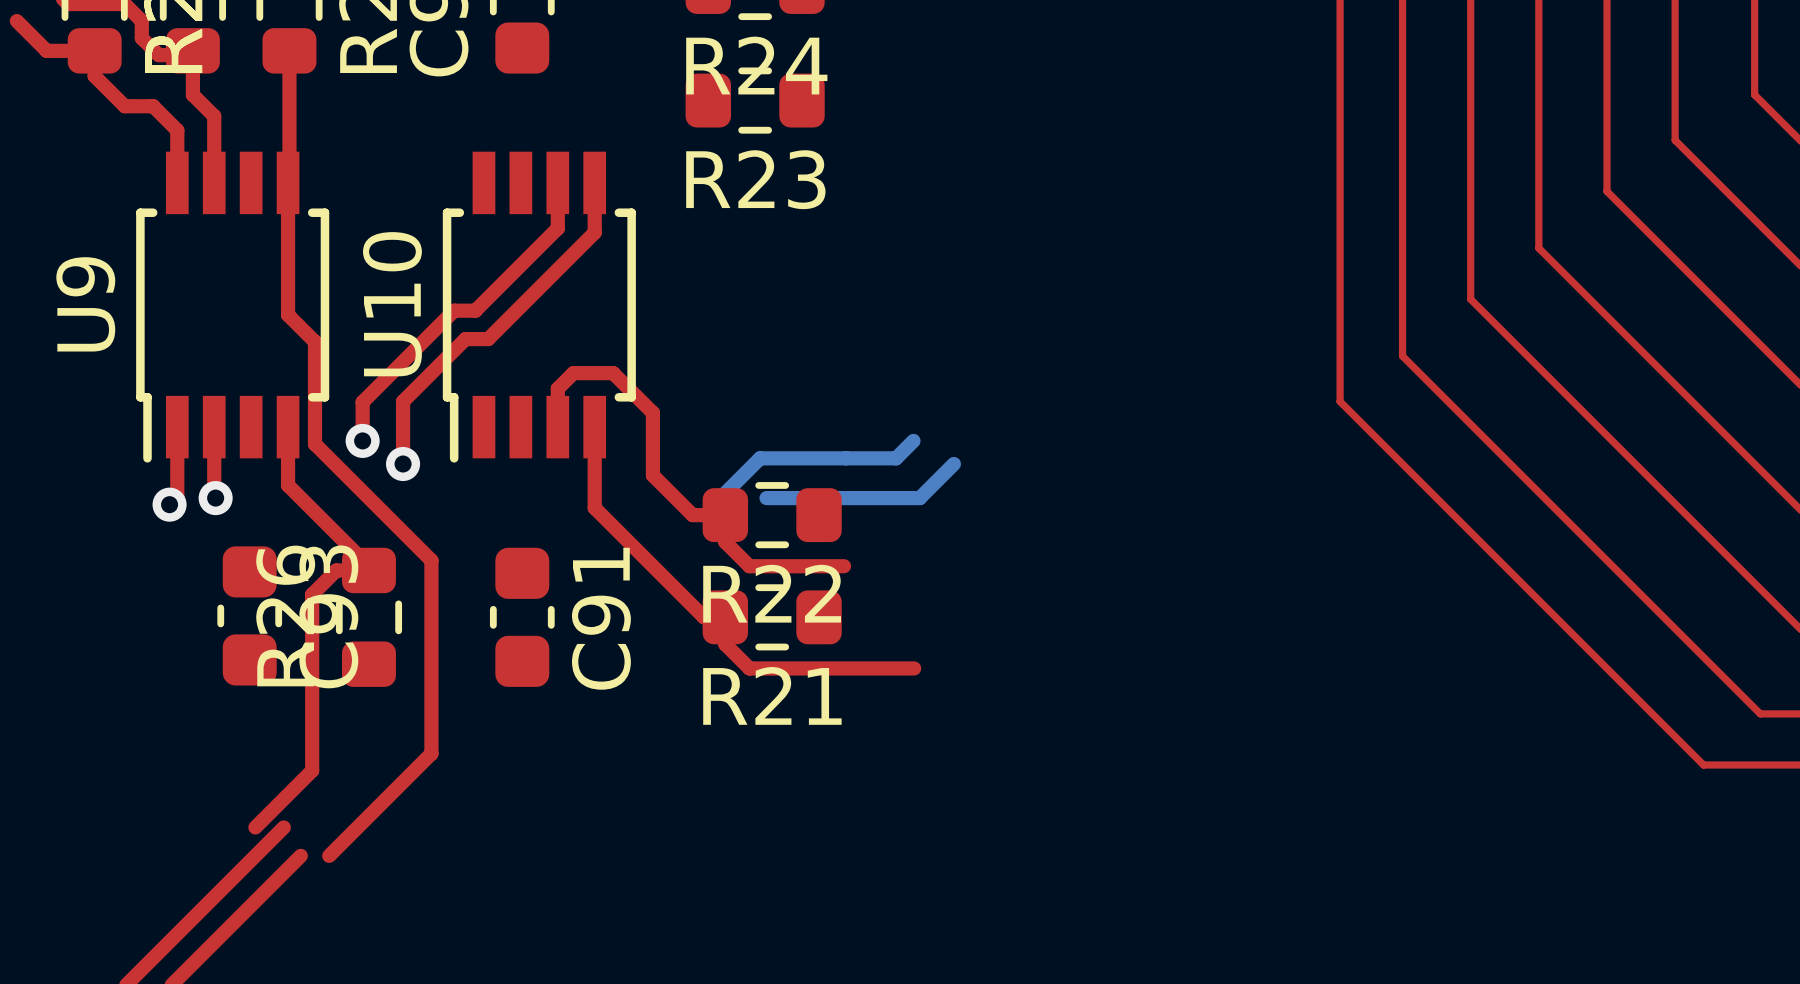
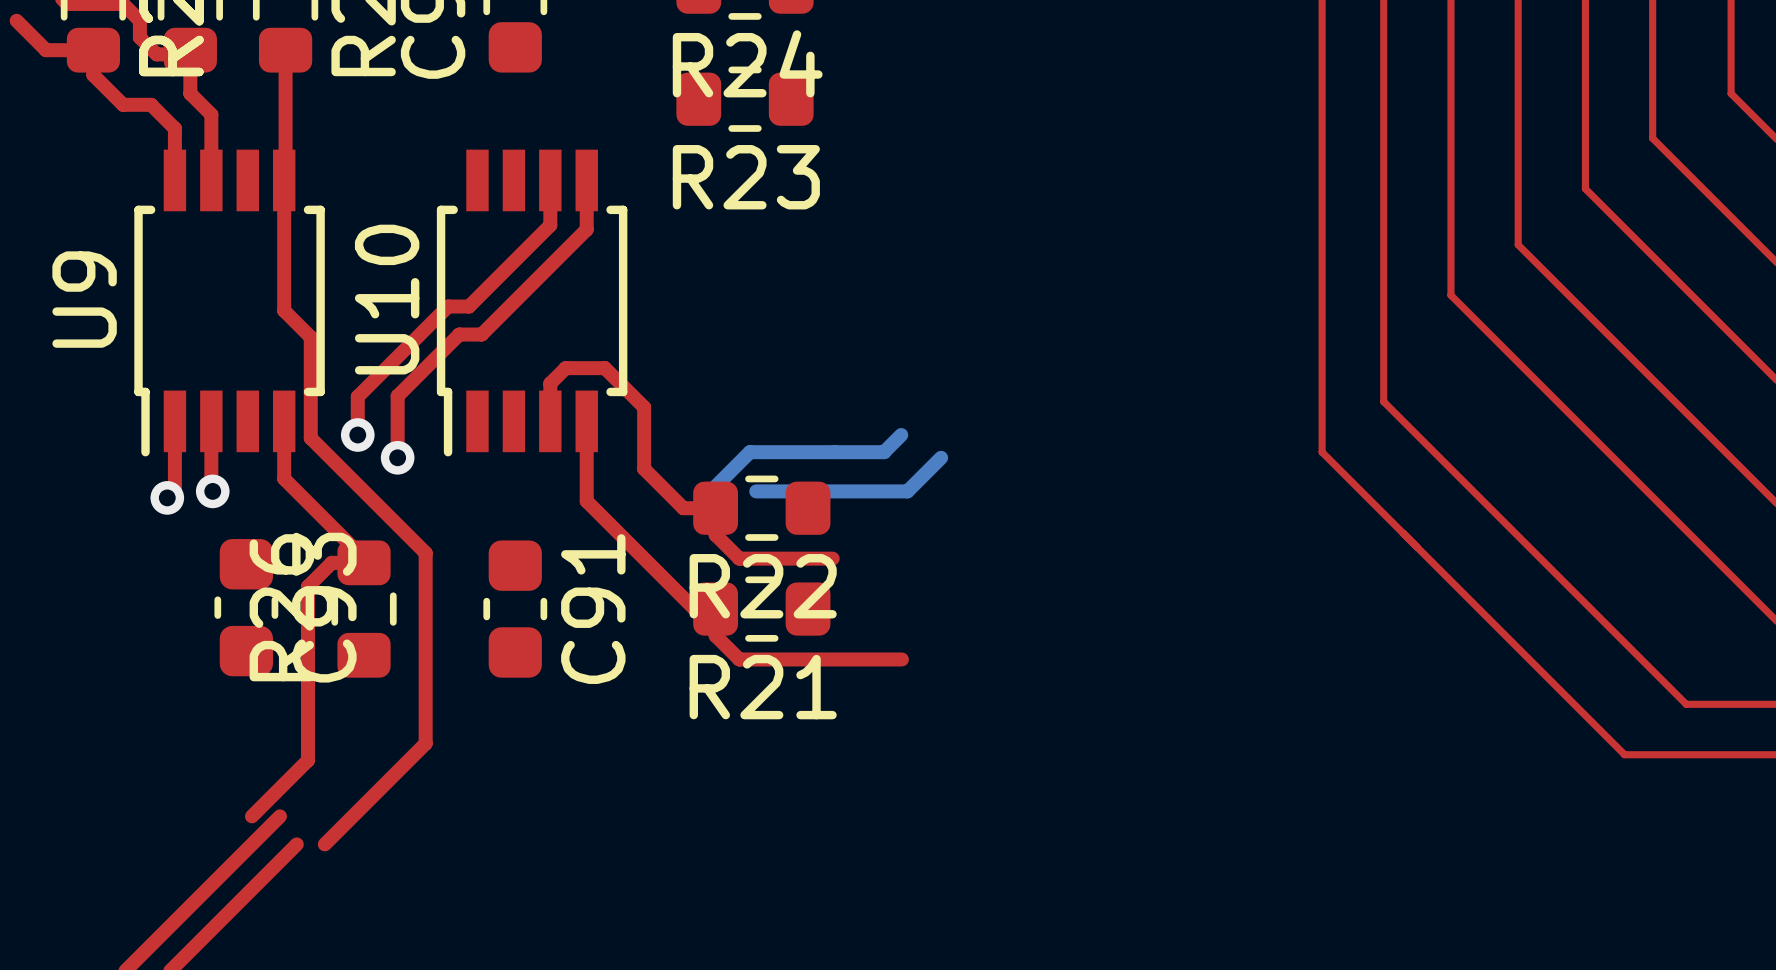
top track: (1402, 356) (1760, 713) -> (1383, 351) (1383, 401) (1686, 704) (1736, 704)
top track: (1340, 401) (1703, 764) -> (1322, 396) (1322, 452) (1624, 754) (1680, 754)

